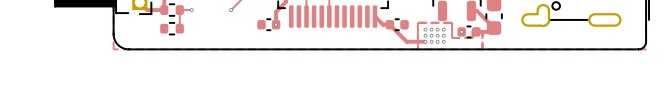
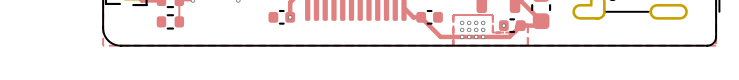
track: none -> (520, 25) (509, 36) (462, 36)

